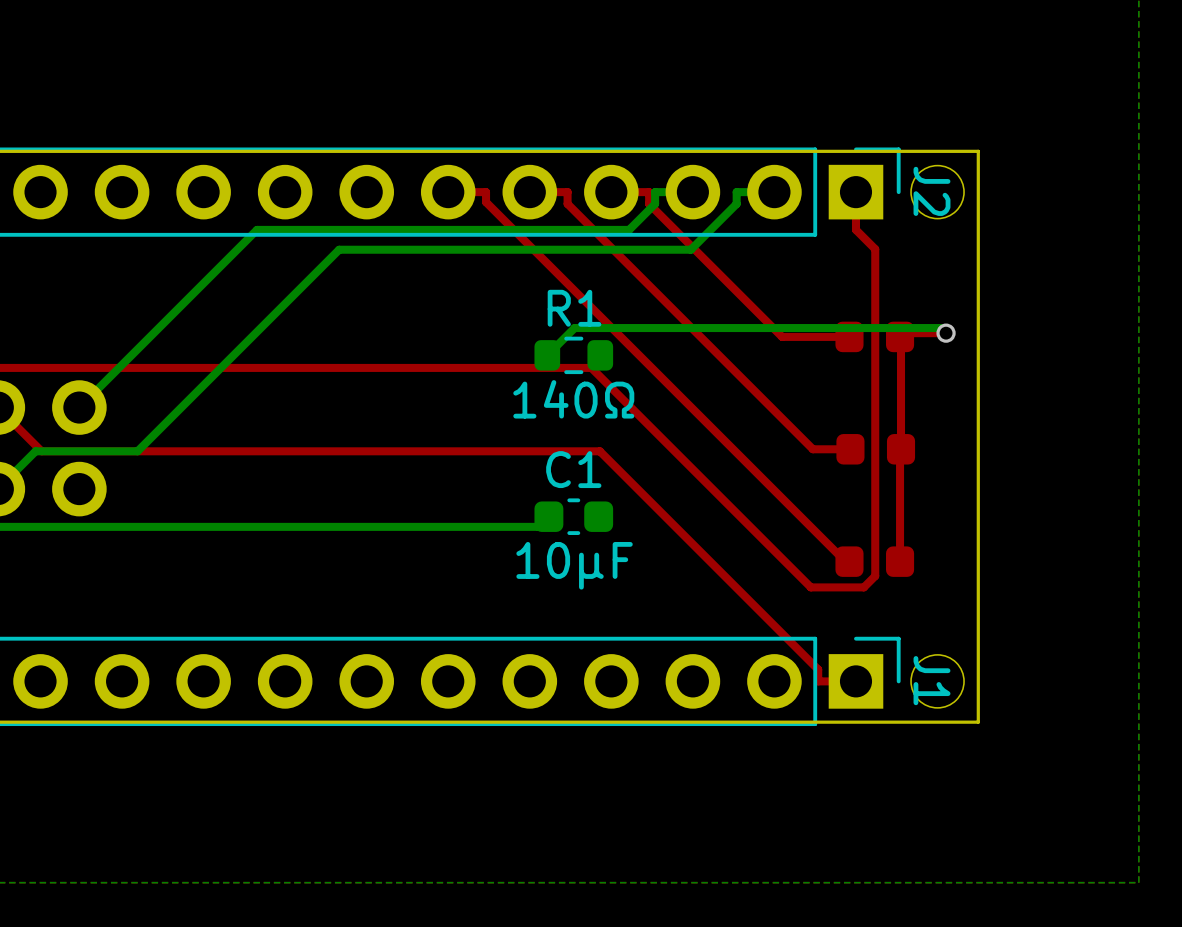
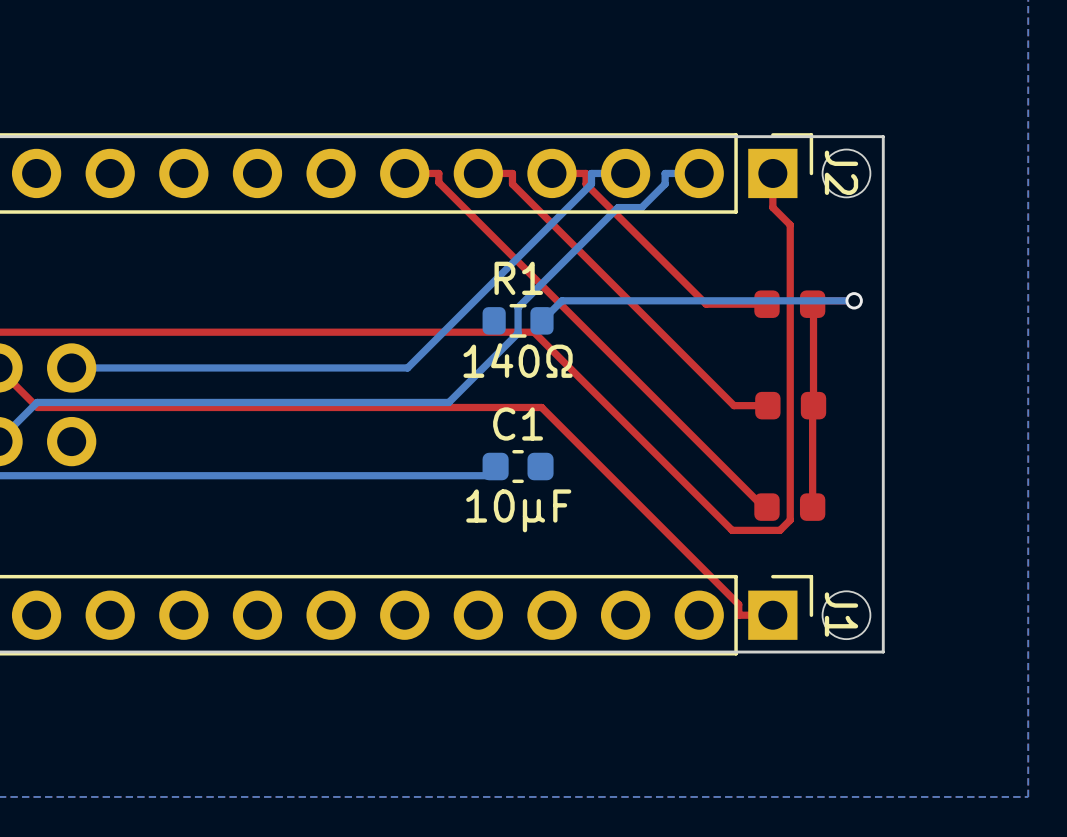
bottom track: (629, 229) (257, 229) (79, 407) -> (568, 207) (407, 367) (71, 367)
bottom track: (710, 229) (690, 249) (339, 249) (137, 451) (35, 451) -> (641, 207) (618, 207) (518, 307) (518, 333) (448, 402) (37, 402) (32, 407)
bottom track: (946, 333) (940, 328) (574, 328) (547, 355) -> (854, 300) (562, 300) (541, 320)

